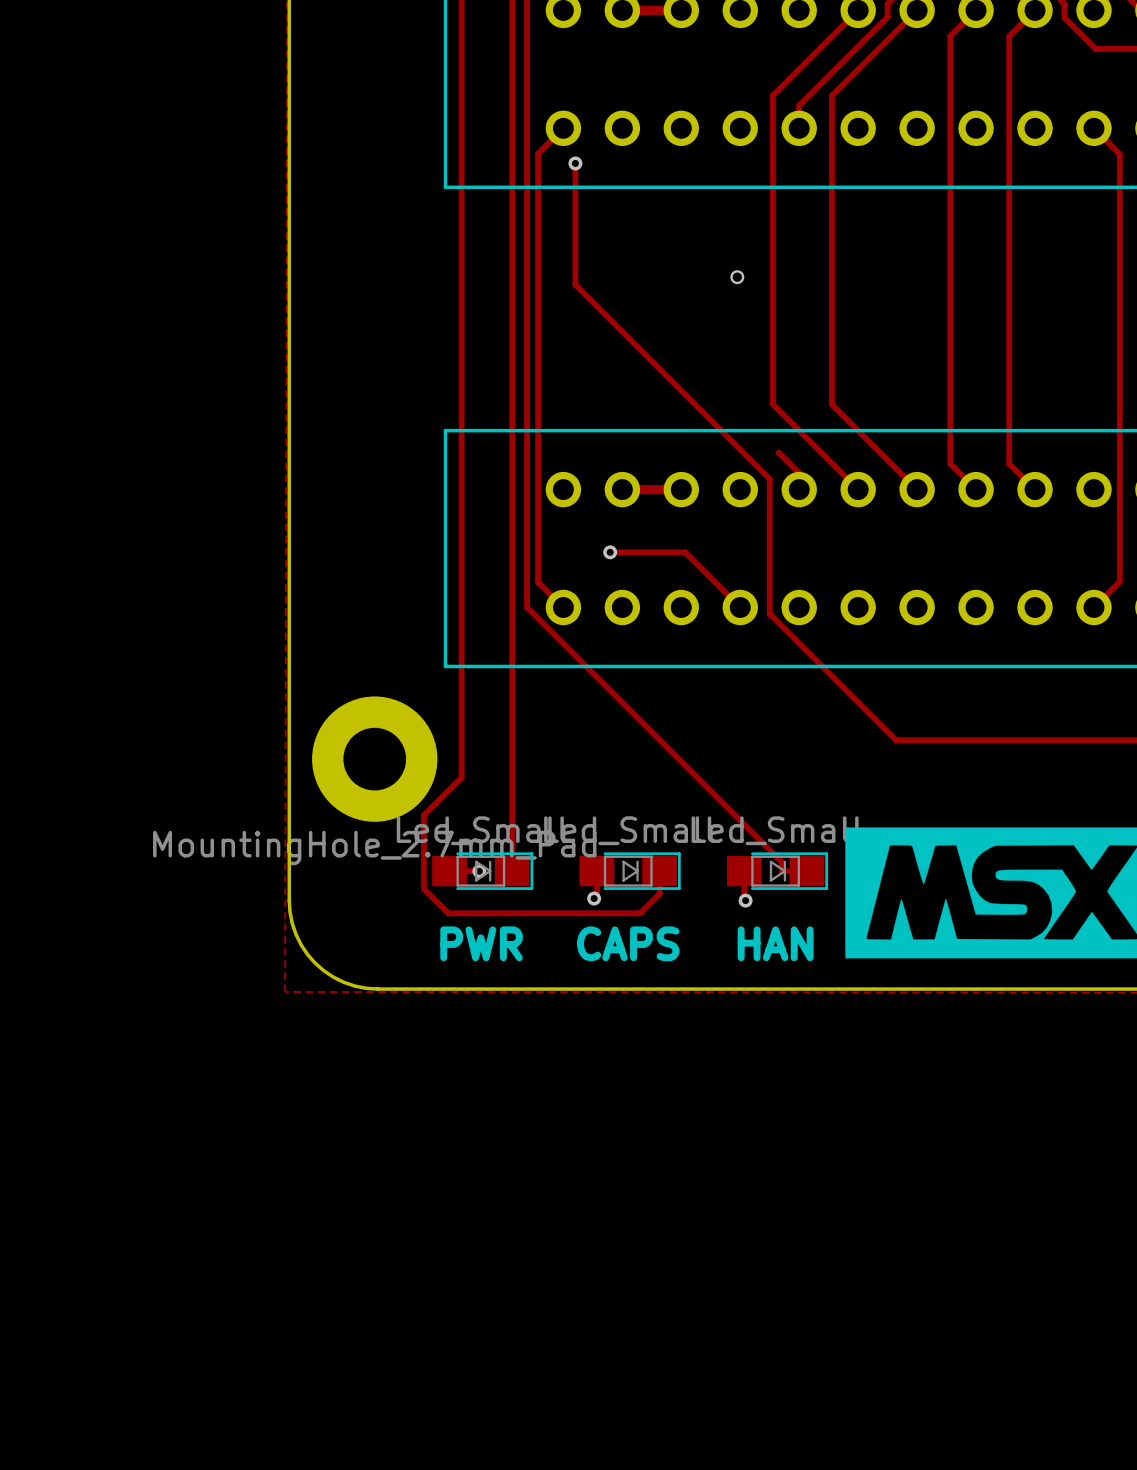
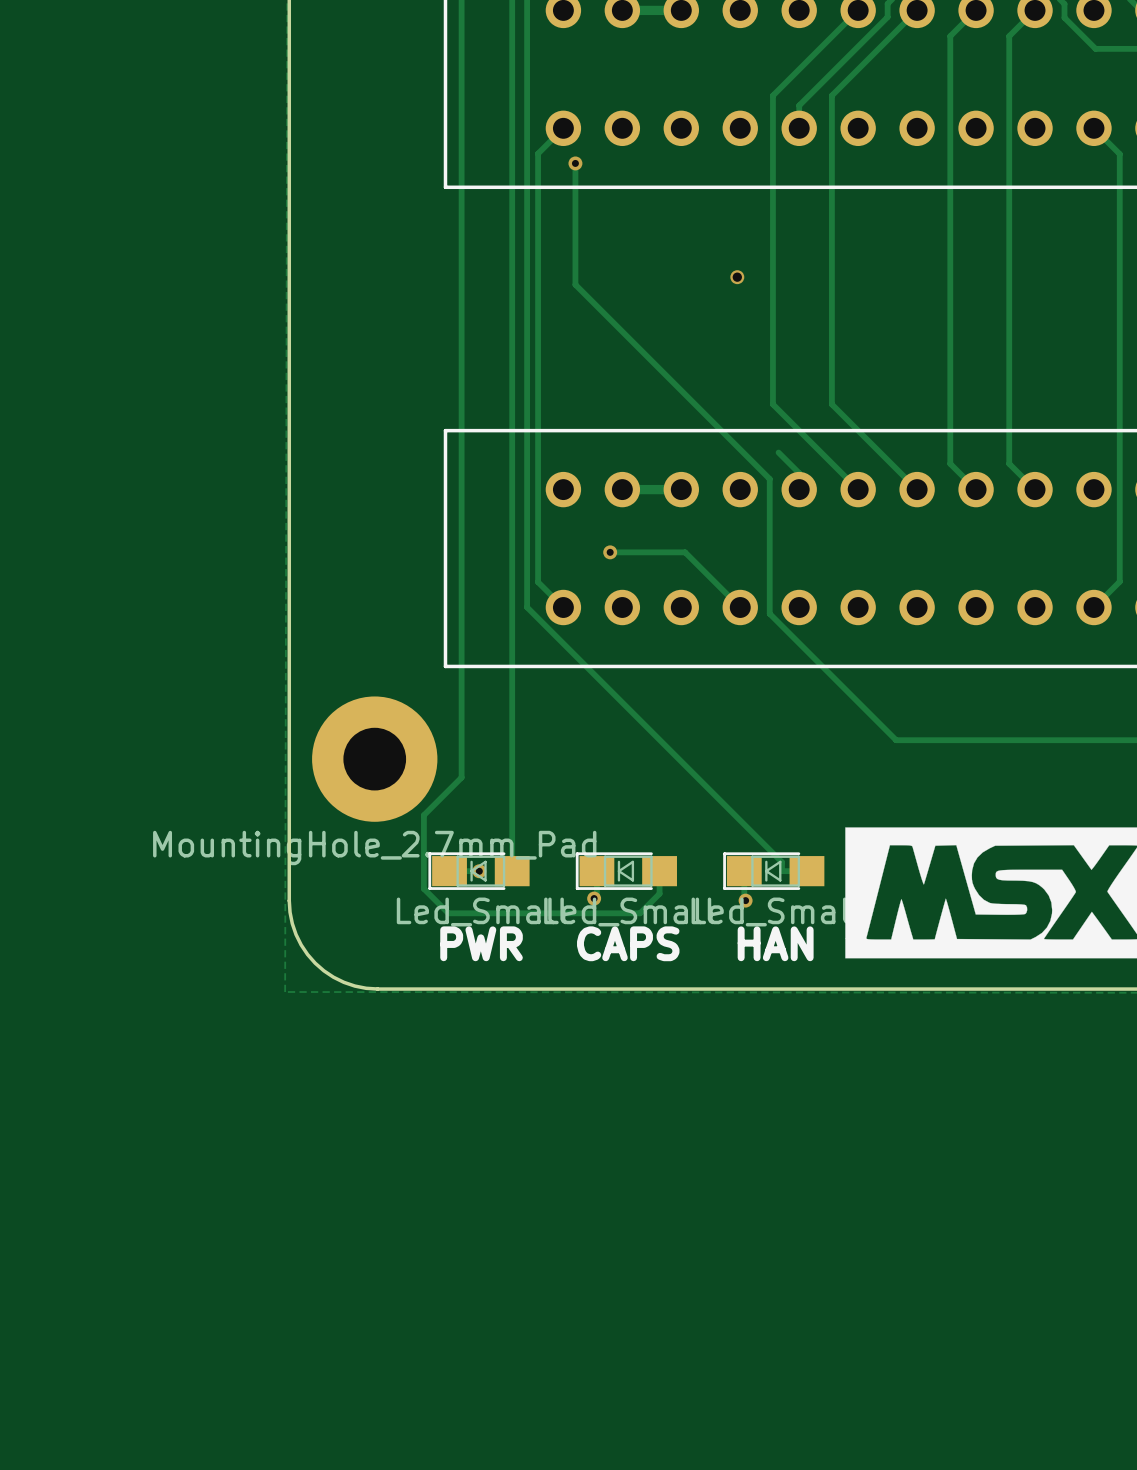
part rotation: 0° (482, 871) -> 180° (479, 871)
part rotation: 0° (630, 871) -> 180° (626, 871)
part rotation: 0° (777, 871) -> 180° (773, 871)

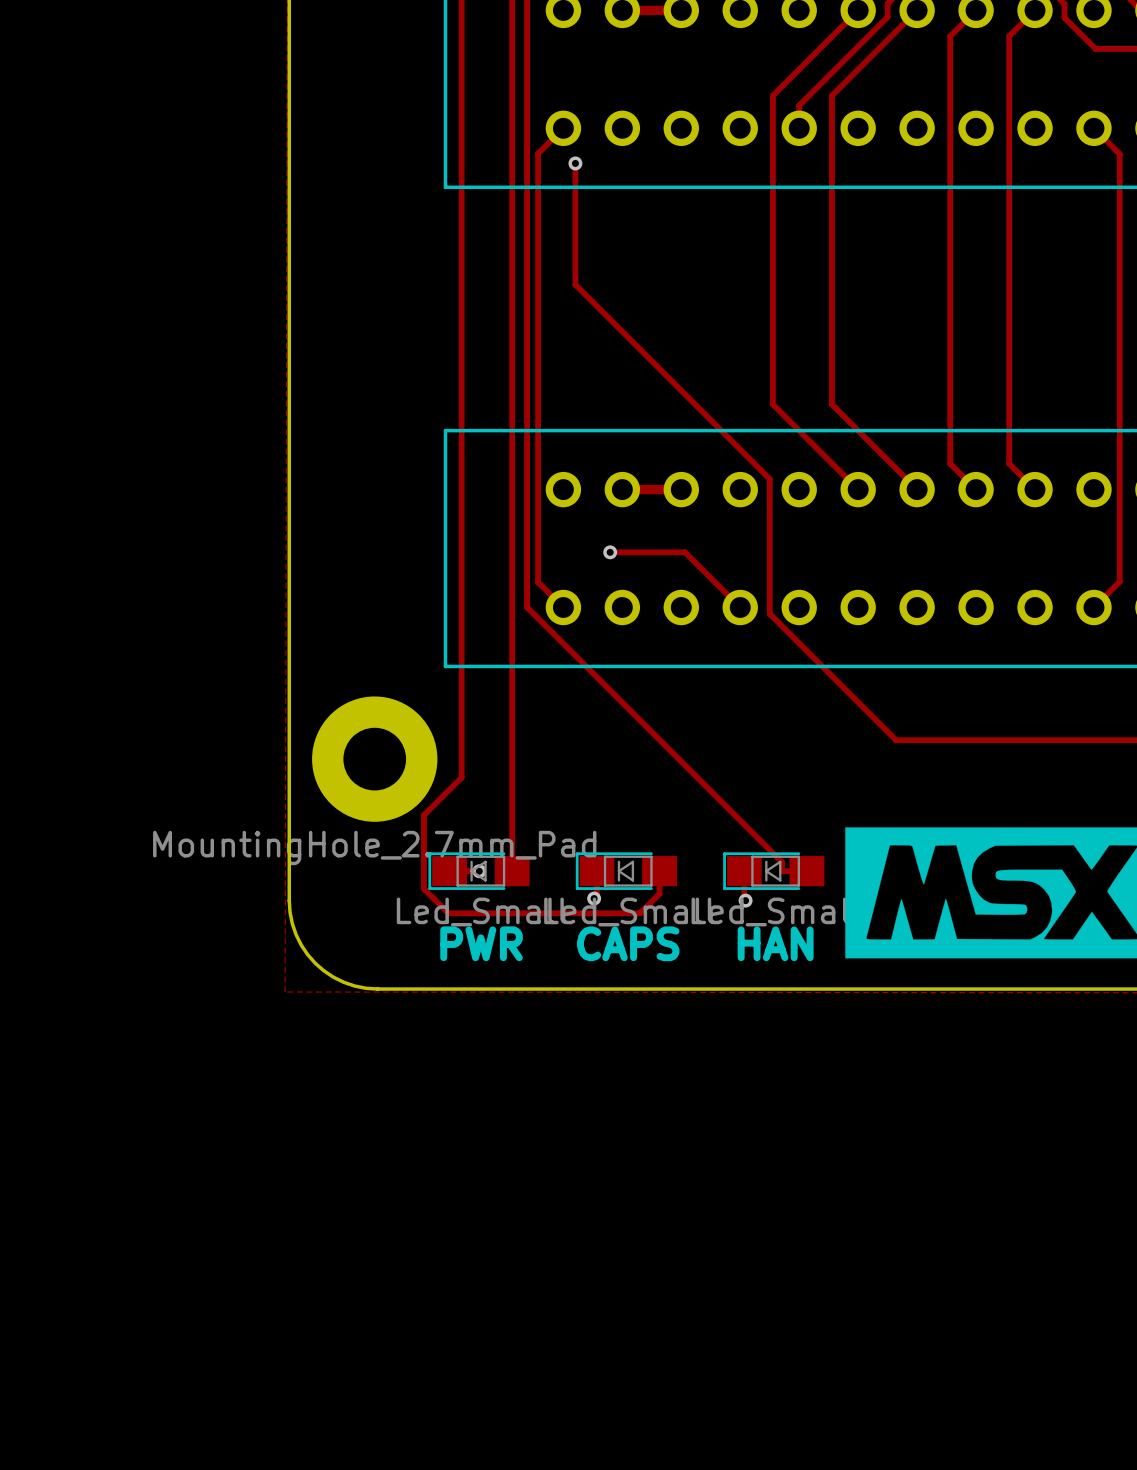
via: (737, 277) -> none
track: (778, 452) (799, 473) (799, 489) -> none

